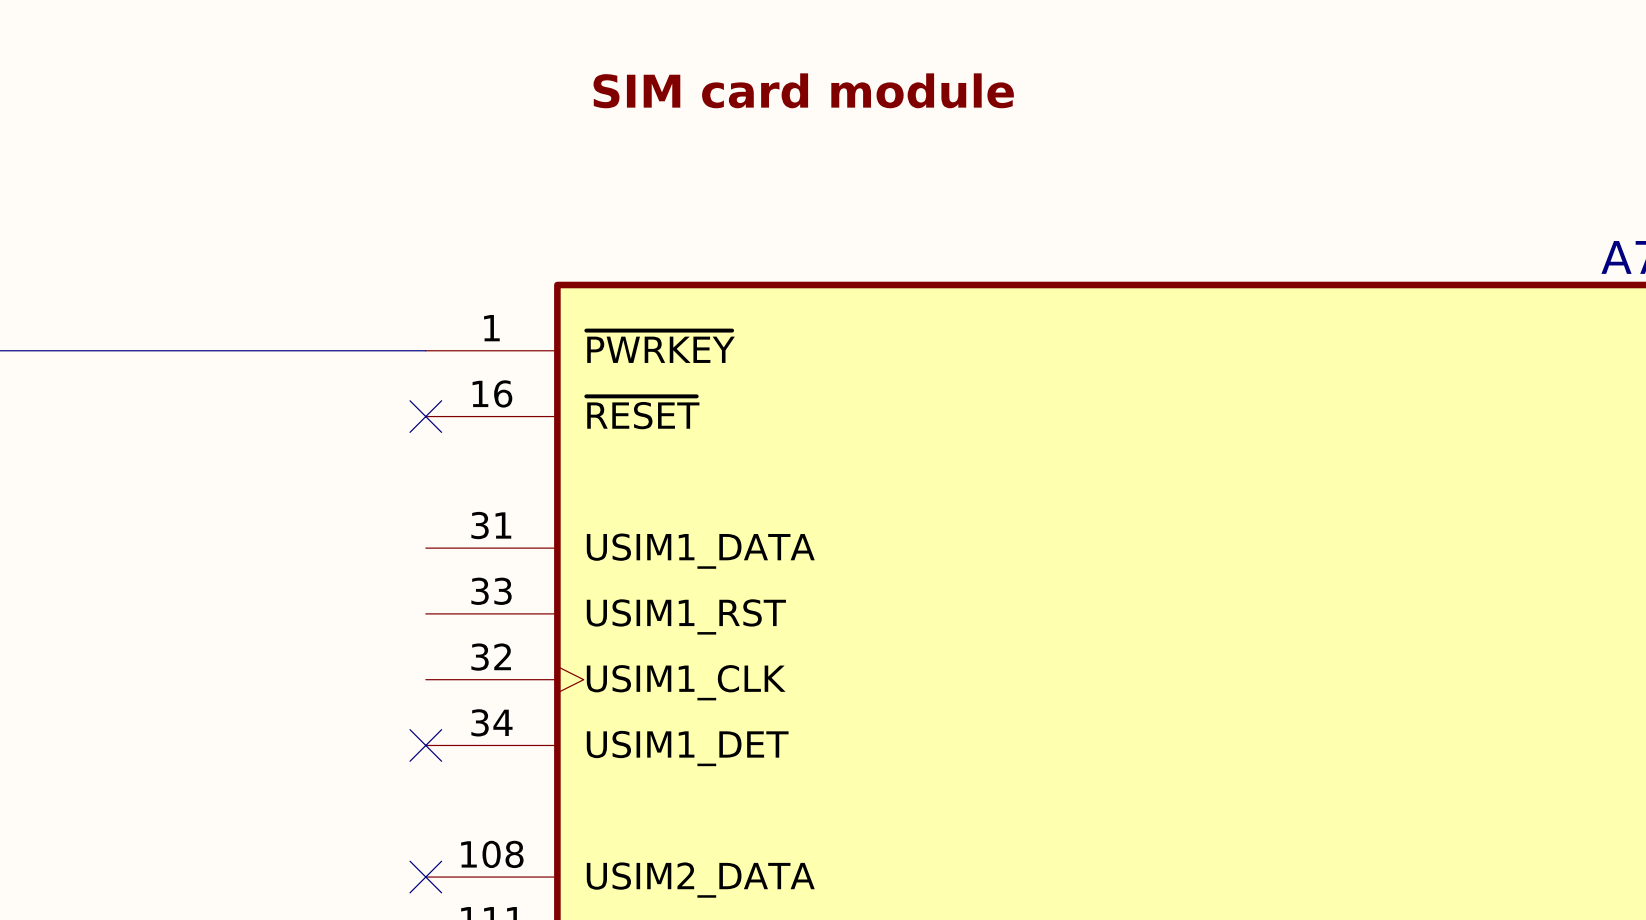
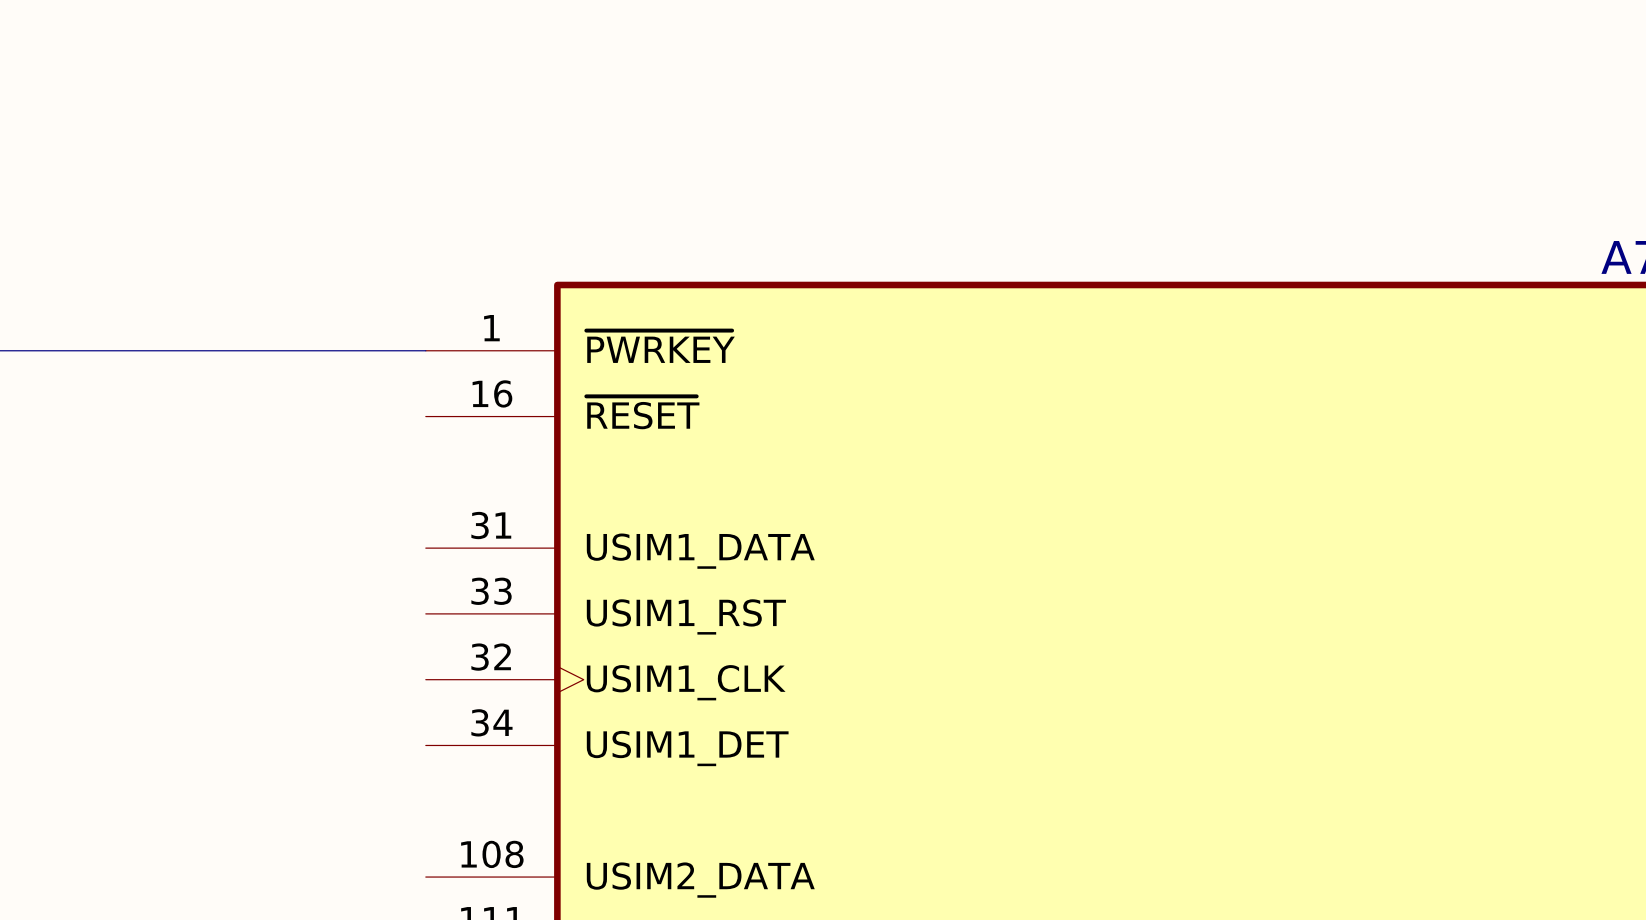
label: SIM card module (803, 90) -> none
no-connect mark: (425, 416) -> none
no-connect mark: (425, 745) -> none
no-connect mark: (425, 877) -> none

